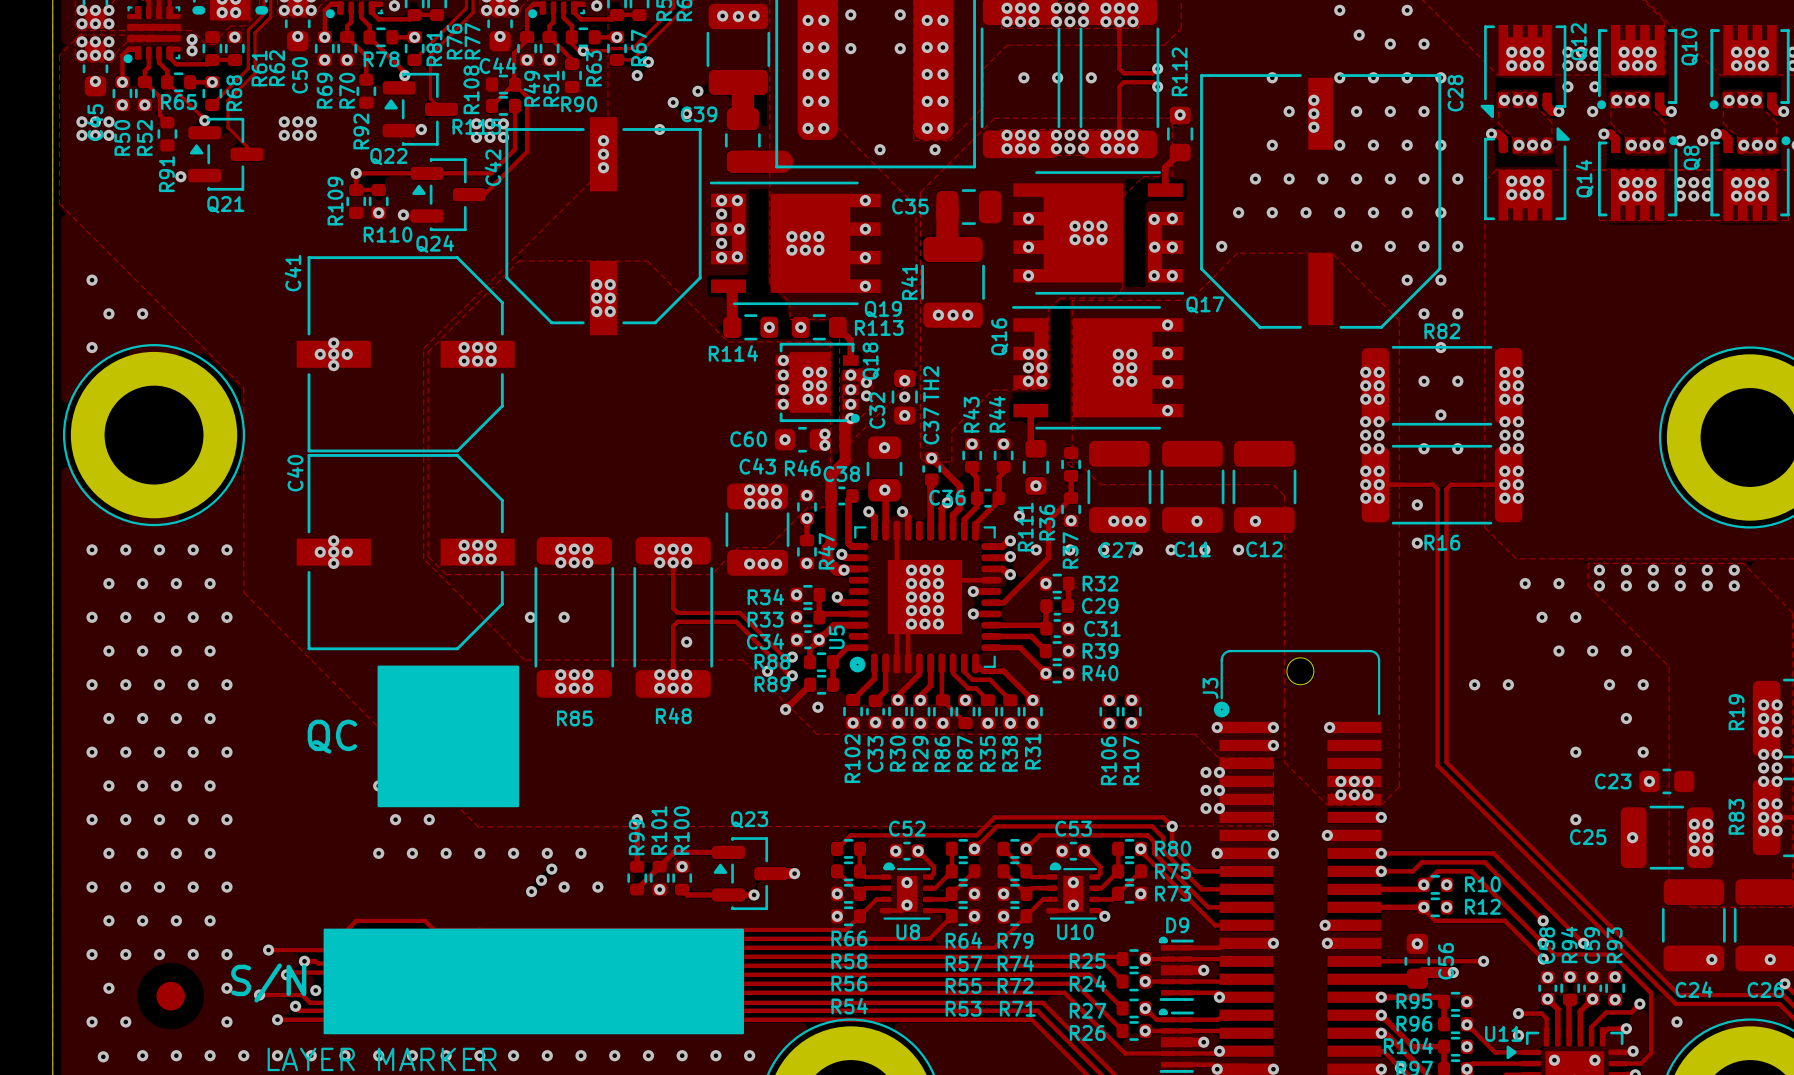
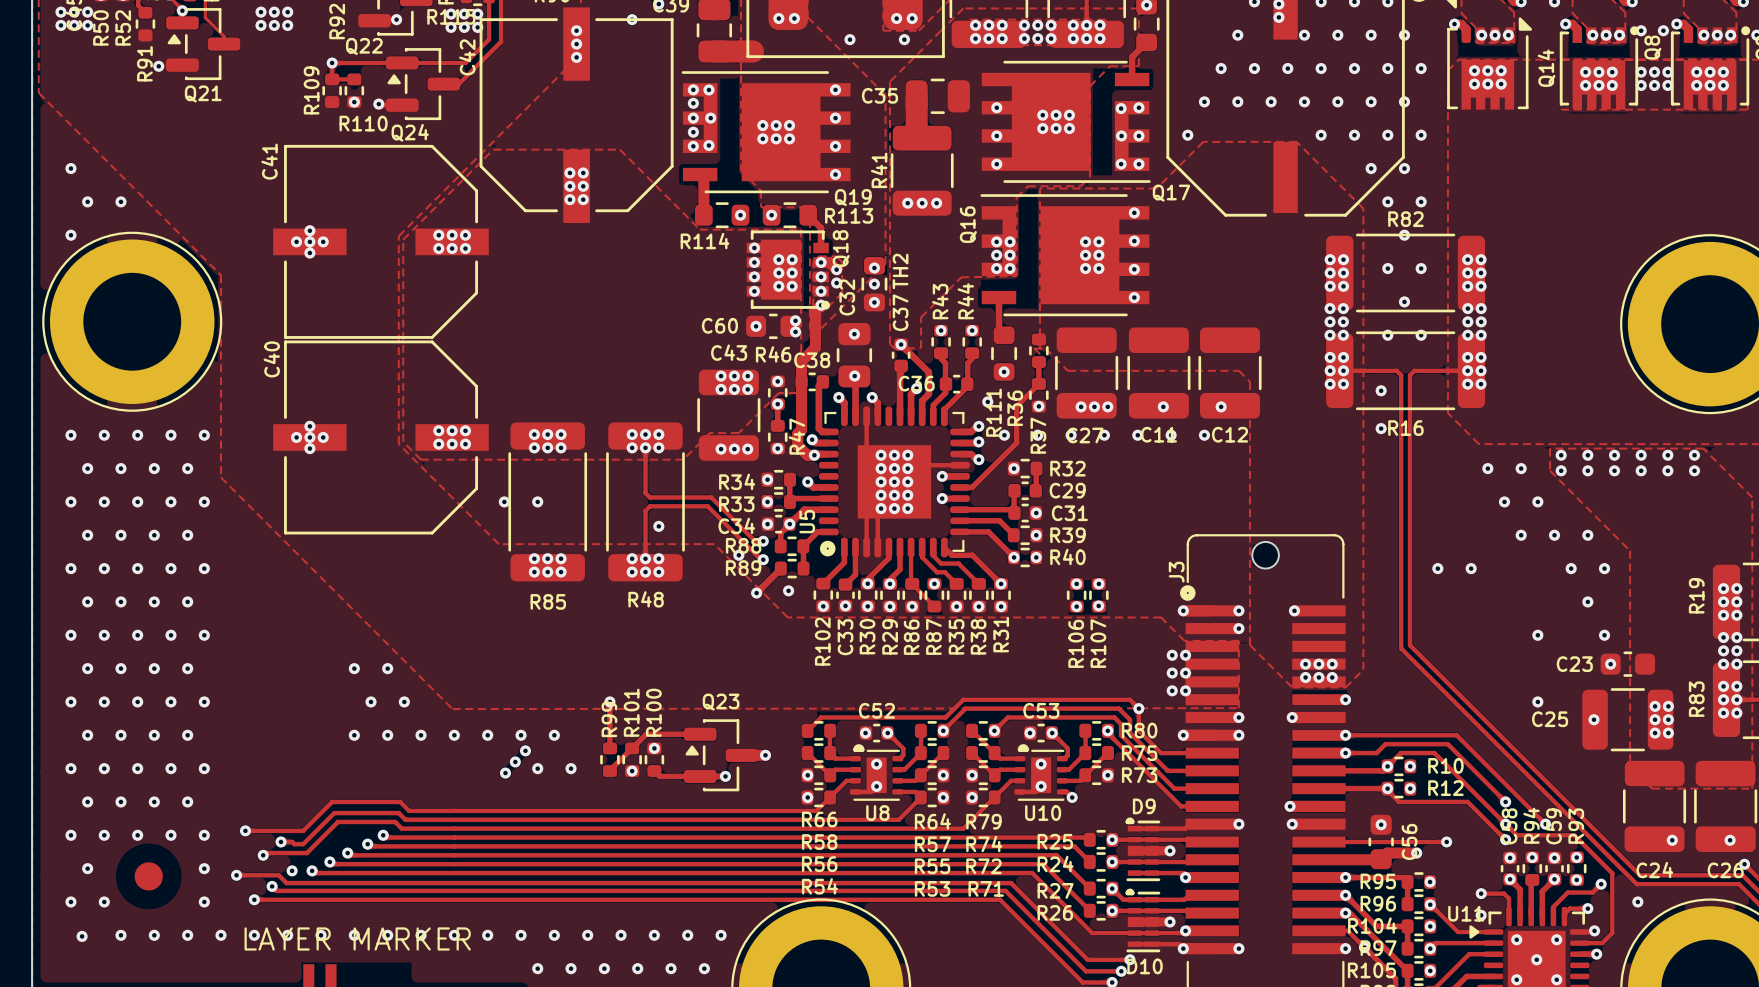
drawing: [377, 665, 520, 808] -> none
text: QC (332, 736) -> none
drawing: [323, 928, 744, 1035] -> none
text: S/N (268, 983) -> none

